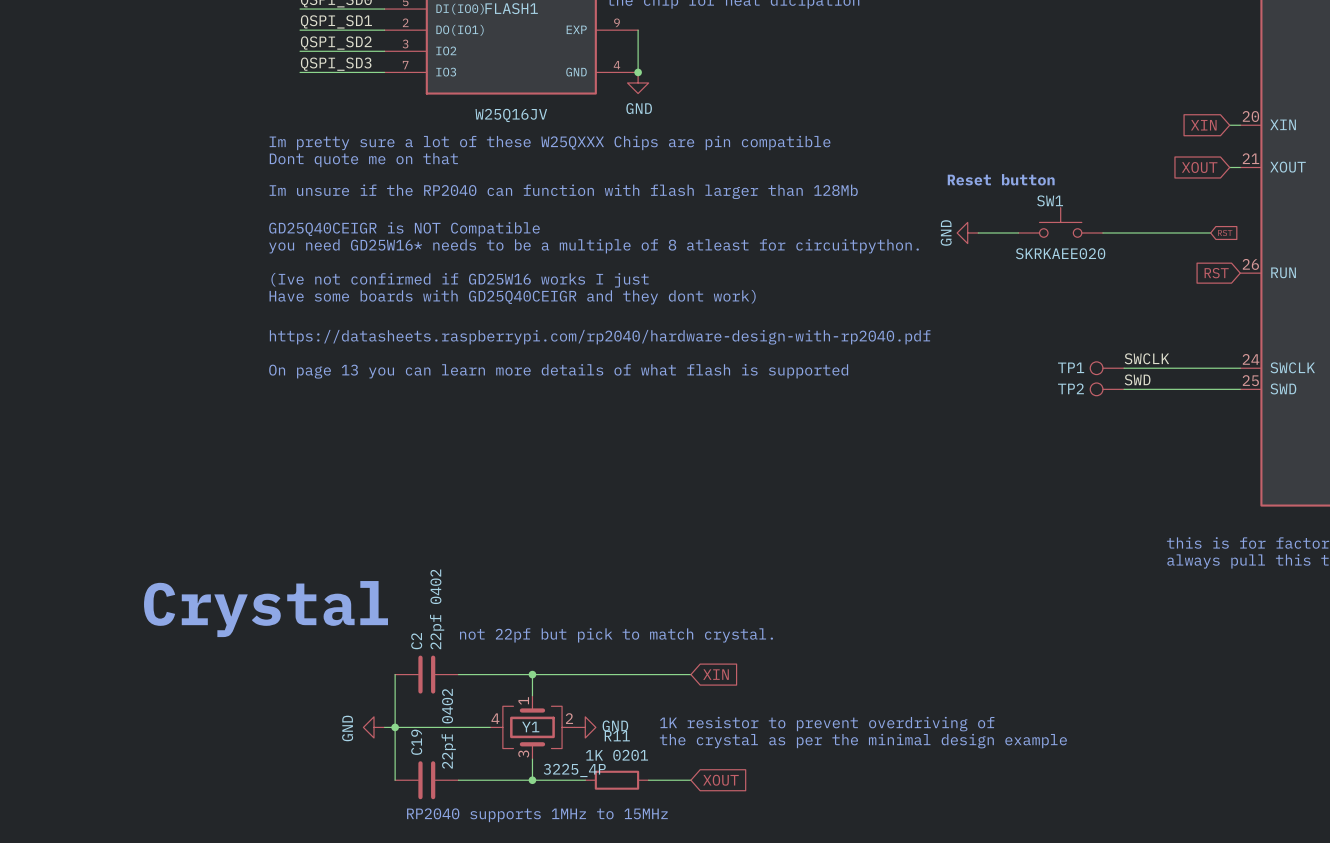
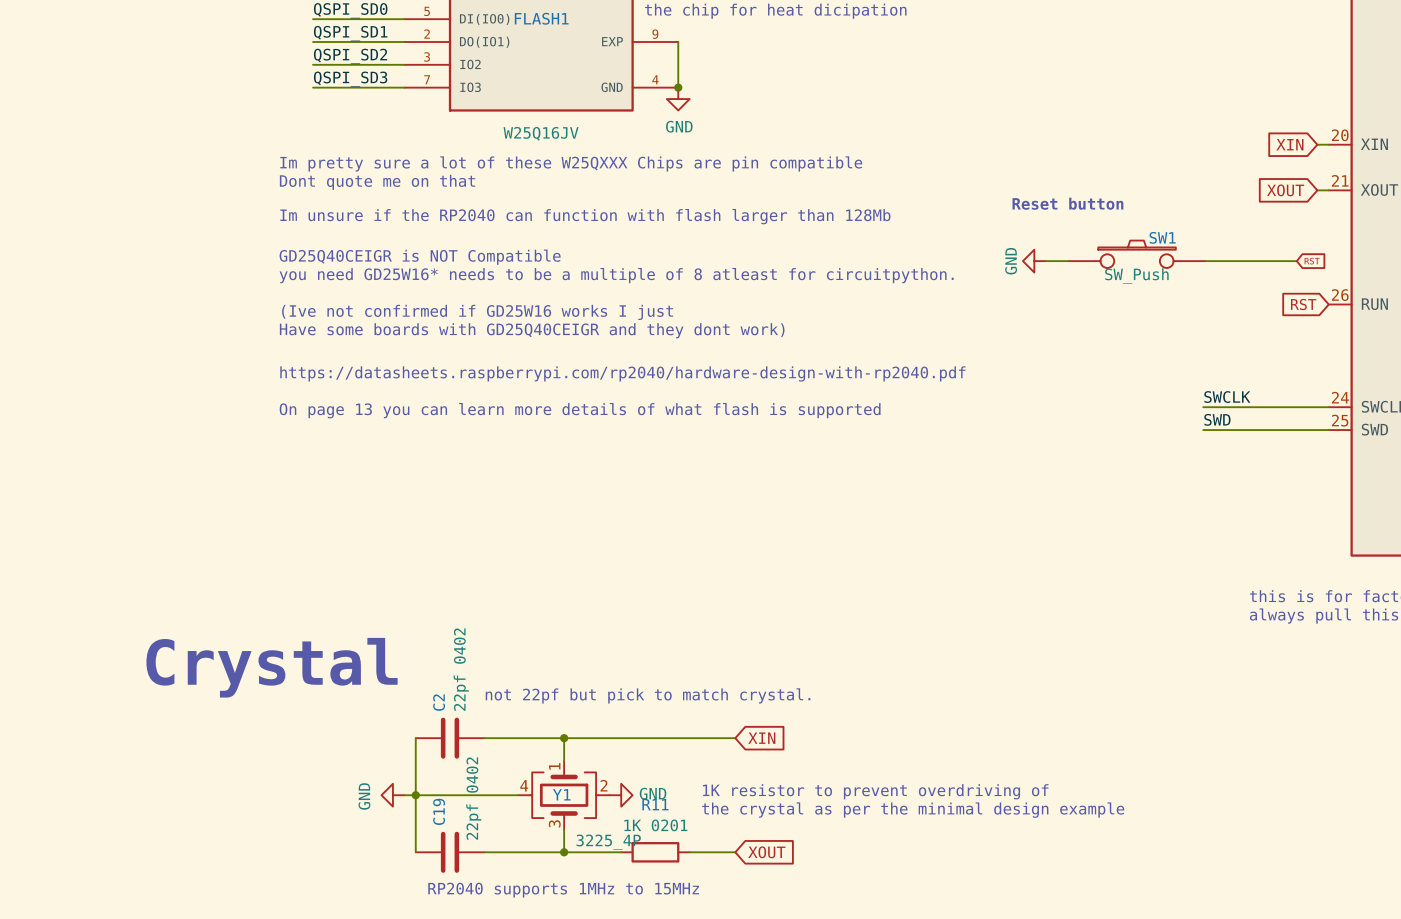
SW1 name position: SW1 (1050, 200) -> SW1 (1162, 237)
SW1 symbol: [1018, 207, 1103, 238] -> [1068, 240, 1206, 268]
SW1 value: SKRKAEE020 (1060, 253) -> SW_Push (1136, 275)
TP1: (1107, 368) -> none
TP2: (1107, 389) -> none

